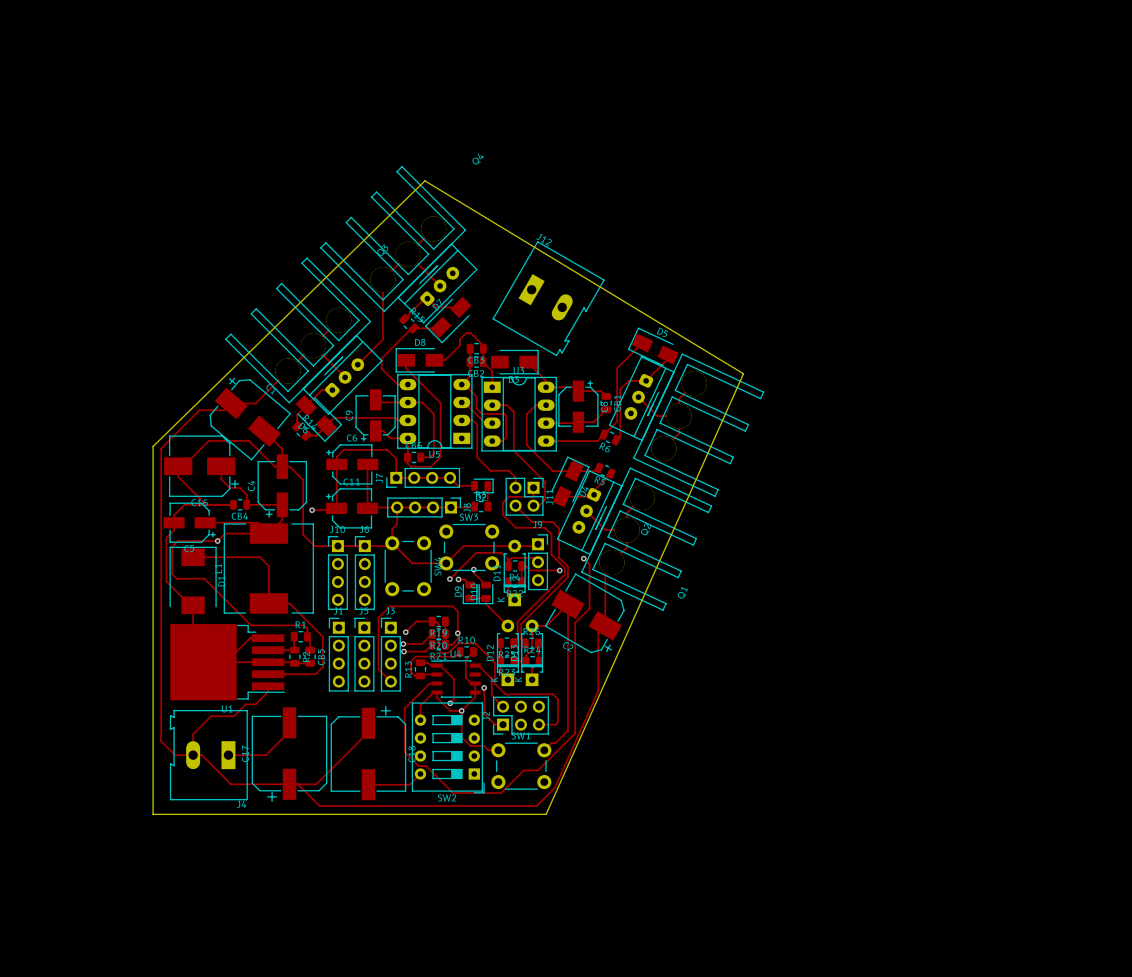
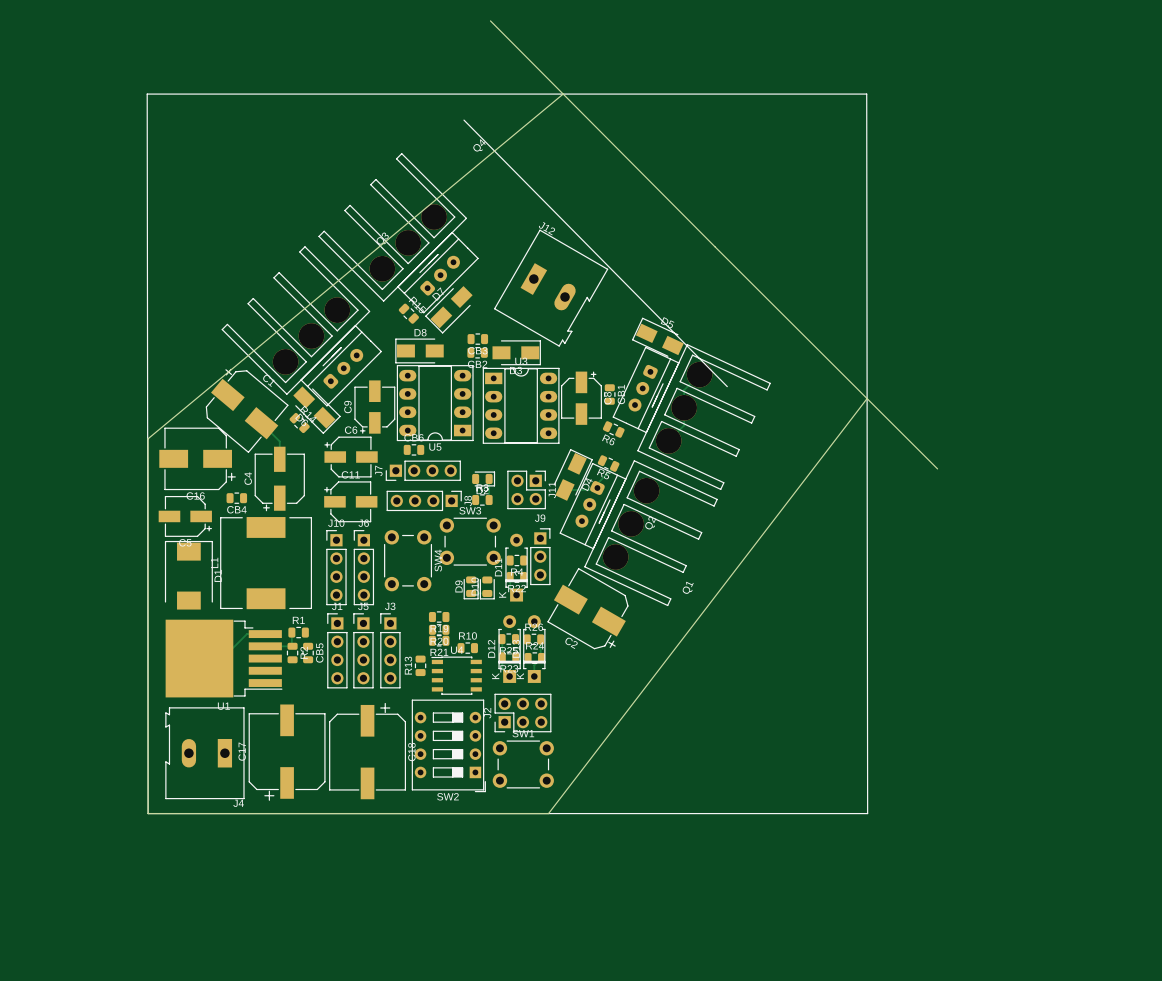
board edge: none -> (490, 20) (937, 468)
line: none -> (147, 94) (866, 94) (867, 813) (148, 813) (147, 94)
line: none -> (463, 120) (727, 386)
track: (433, 228) (382, 279) (382, 339) (357, 364) -> none
track: (408, 254) (440, 285) -> none
track: (460, 307) (436, 307) (427, 298) (424, 298) (404, 319) -> none
track: (338, 320) (255, 403) (231, 403) (224, 410) (199, 410) (161, 448) (161, 741) (175, 755) (201, 755) (231, 784) (316, 784) (368, 732) (368, 723) -> none
track: (440, 327) (411, 328) (381, 358) (381, 368) (397, 384) (407, 384) -> none
track: (642, 343) (617, 368) (617, 421) (597, 441) (546, 441) -> none
track: (313, 345) (345, 377) -> none
track: (470, 348) (470, 376) (461, 384) (464, 384) (476, 396) (476, 408) (482, 413) (504, 413) (506, 415) (506, 437) (502, 441) (492, 441) -> none
track: (668, 354) (668, 358) (646, 380) (628, 380) (620, 389) (620, 435) (616, 440) -> none
track: (406, 360) (406, 368) (440, 402) (440, 457) (430, 466) (411, 466) (407, 463) (407, 438) (390, 438) (383, 430) (375, 430) (375, 425) -> none
track: (434, 360) (444, 360) (459, 345) (459, 339) (466, 333) (471, 333) (486, 348) (483, 348) (483, 362) (492, 371) (492, 387) -> none
track: (525, 360) (546, 380) (546, 387) (574, 387) (578, 391) (600, 391) (606, 396) -> none
track: (332, 390) (322, 390) (297, 414) (297, 426) -> none
track: (638, 397) (657, 416) (679, 416) -> none
track: (461, 402) (464, 402) (485, 423) (492, 423) -> none
track: (372, 403) (375, 399) (378, 402) (422, 402) (433, 413) (433, 453) (430, 457) (420, 457) -> none
track: (492, 405) (507, 405) (513, 411) (513, 450) (545, 481) (545, 499) (539, 505) (533, 505) -> none
track: (546, 405) (535, 405) (526, 414) (526, 444) (552, 471) (595, 471) (599, 468) -> none
board edge: none -> (867, 398) (548, 813)
track: (606, 409) (593, 422) (546, 423) -> none
track: (407, 420) (397, 420) (395, 418) (334, 418) (316, 435) (306, 435) -> none
track: (461, 420) (472, 420) (477, 424) (477, 457) (490, 470) (508, 470) (515, 477) (515, 487) -> none
board edge: (153, 446) (424, 180) (743, 373) (546, 814) -> (148, 438) (563, 94)
track: (367, 464) (367, 508) (474, 506) -> none
track: (221, 466) (221, 479) (229, 487) (239, 487) (246, 494) (246, 504) (282, 504) (282, 520) (268, 533) -> none
track: (474, 485) (458, 485) (450, 477) (396, 477) (396, 458) (387, 449) (343, 449) (336, 457) (336, 508) (334, 510) (312, 510) -> none
track: (533, 487) (532, 496) (508, 496) (503, 502) (503, 514) (515, 527) (545, 527) (551, 534) (551, 554) (564, 568) (564, 574) (517, 621) (517, 639) (513, 643) -> none
track: (642, 497) (627, 512) (627, 547) (605, 569) (605, 625) (598, 632) (598, 690) (554, 787) (536, 805) (319, 805) (297, 784) -> none
track: (206, 504) (178, 476) (178, 466) (183, 466) (208, 440) (249, 440) (274, 466) (289, 466) (303, 480) (303, 534) (314, 546) (389, 546) (392, 543) -> none
track: (233, 504) (184, 504) (174, 515) (174, 530) (166, 537) (166, 581) (190, 605) (193, 605) (193, 651) (203, 662) (310, 663) -> none
track: (515, 505) (531, 522) (552, 522) (559, 528) (559, 557) (567, 566) (567, 577) (521, 624) (521, 639) (525, 643) -> none
track: (397, 507) (397, 524) (392, 529) (392, 543) -> none
via: (312, 510) -> none
track: (586, 511) (605, 530) (627, 530) -> none
track: (205, 522) (258, 522) (268, 533) -> none
track: (268, 533) (225, 533) (217, 541) (177, 541) (172, 546) (172, 574) (176, 578) (204, 578) (251, 625) (304, 625) (307, 628) (307, 636) (310, 639) (310, 650) -> none
via: (217, 541) -> none
track: (392, 543) (412, 563) (446, 563) (463, 546) (536, 546) (538, 544) -> none
track: (193, 557) (260, 557) (268, 565) (268, 603) (289, 603) (322, 636) (322, 667) (315, 674) (268, 674) -> none
track: (583, 558) (589, 564) (589, 608) (575, 622) (575, 733) (537, 770) (523, 770) (501, 793) (453, 793) (426, 766) (418, 766) (404, 752) (404, 708) (429, 683) (437, 683) -> none
via: (583, 558) -> none
track: (508, 561) (512, 557) (537, 557) (538, 562) -> none
track: (508, 565) (508, 559) (501, 552) (476, 552) (449, 579) -> none
track: (473, 569) (473, 572) (485, 585) -> none
via: (473, 569) -> none
track: (559, 570) (530, 570) (525, 565) (521, 565) (521, 582) -> none
via: (559, 570) -> none
via: (449, 579) -> none
track: (458, 579) (464, 579) (470, 585) -> none
via: (458, 579) -> none
track: (485, 598) (485, 604) (507, 625) -> none
track: (445, 621) (445, 644) (452, 644) (457, 639) (457, 611) (452, 606) (389, 606) (378, 617) (378, 669) (390, 681) -> none
track: (405, 632) (416, 621) (435, 621) (438, 624) (438, 650) (441, 653) (448, 653) (458, 643) (475, 643) (494, 662) (494, 683) (505, 694) (552, 694) (557, 699) (557, 722) (555, 724) (538, 724) -> none
via: (405, 632) -> none
via: (457, 633) -> none
track: (432, 634) (422, 644) (403, 644) -> none
via: (403, 644) -> none
track: (432, 644) (425, 651) (403, 651) -> none
via: (403, 651) -> none
track: (460, 651) (455, 656) (415, 656) (410, 661) (410, 671) (414, 675) (437, 674) -> none
track: (473, 651) (465, 659) (465, 677) (471, 683) (475, 683) (475, 697) (461, 710) -> none
track: (513, 660) (525, 661) (525, 656) (532, 649) (532, 625) (546, 625) (567, 604) (567, 730) (555, 743) (551, 743) (544, 750) -> none
track: (420, 662) (440, 665) (453, 678) (453, 699) (450, 703) -> none
track: (475, 665) (478, 665) (491, 678) (491, 695) (503, 706) -> none
track: (268, 686) (268, 691) (255, 704) (246, 704) (234, 716) (211, 716) (193, 734) (193, 755) -> none
track: (484, 687) (484, 713) (495, 724) (503, 724) -> none
via: (484, 687) -> none
via: (450, 703) -> none
track: (461, 710) (450, 710) (437, 697) (437, 692) (433, 692) (420, 705) (420, 720) -> none
track: (461, 710) (461, 737) (470, 746) (484, 746) (488, 750) (498, 750) -> none
via: (461, 710) -> none
track: (289, 722) (289, 731) (266, 755) (228, 755) -> none
track: (420, 773) (409, 784) (368, 784) -> none

